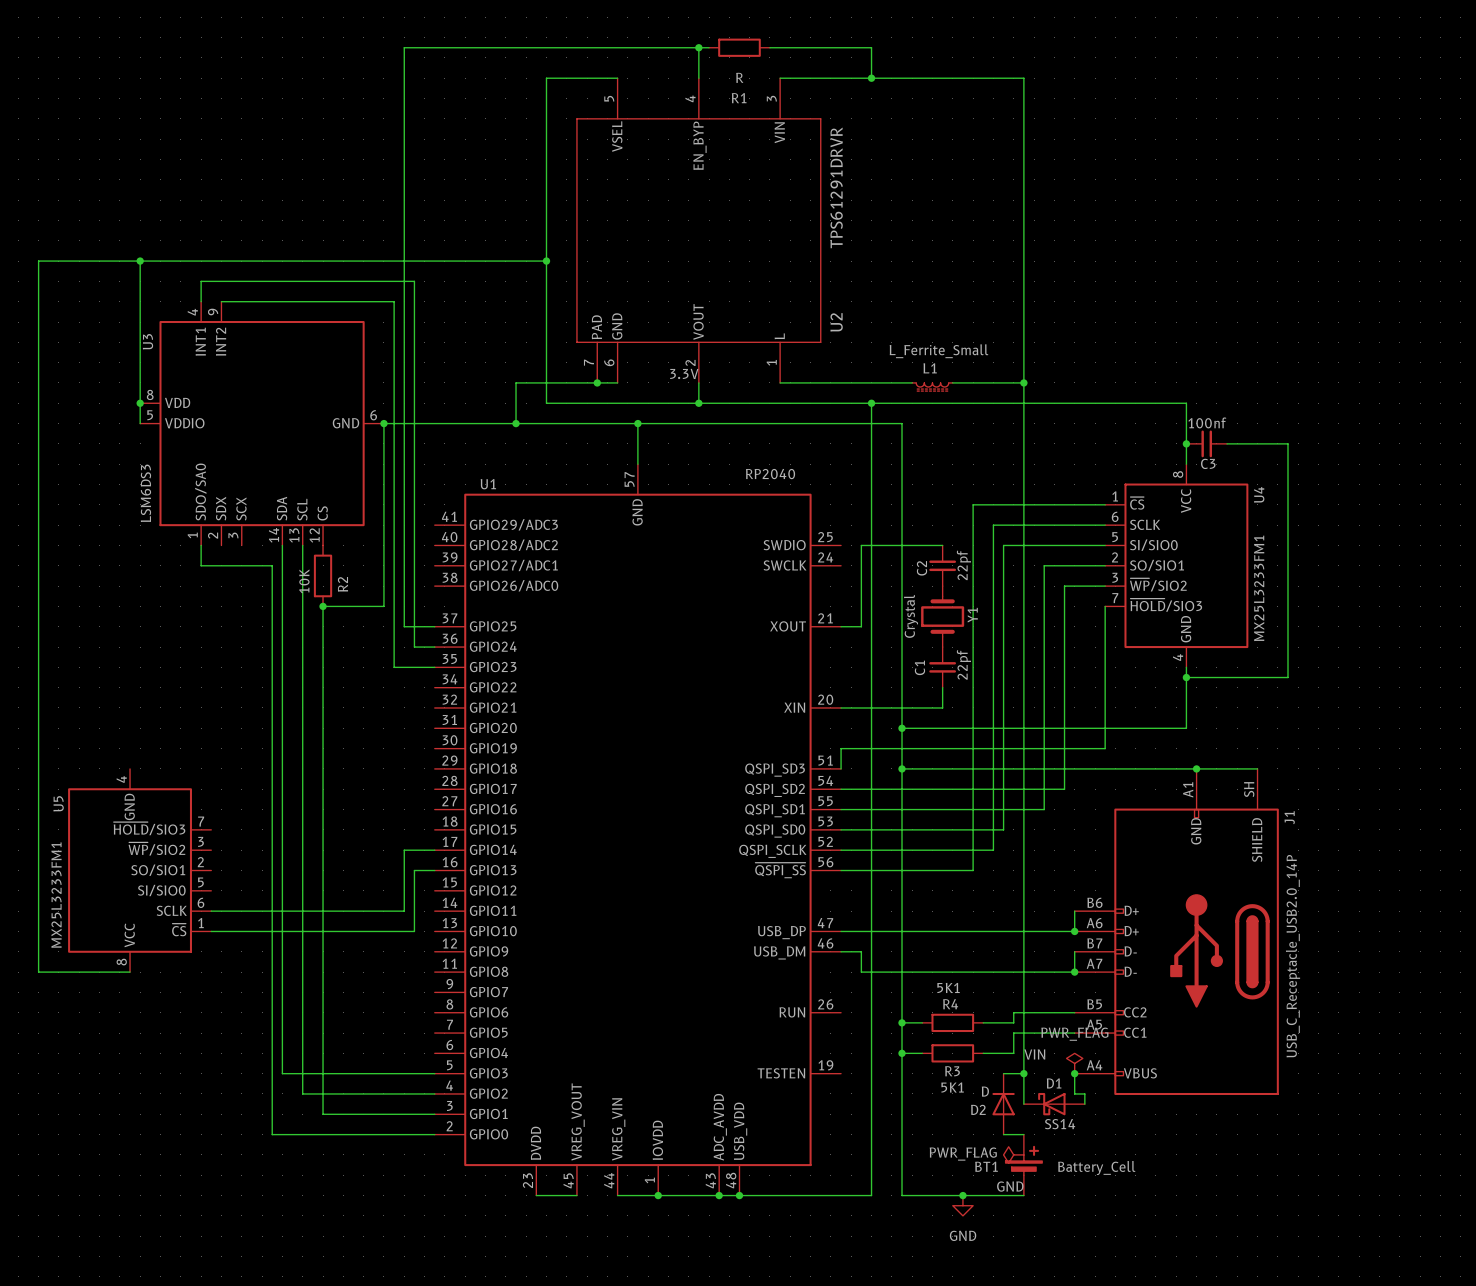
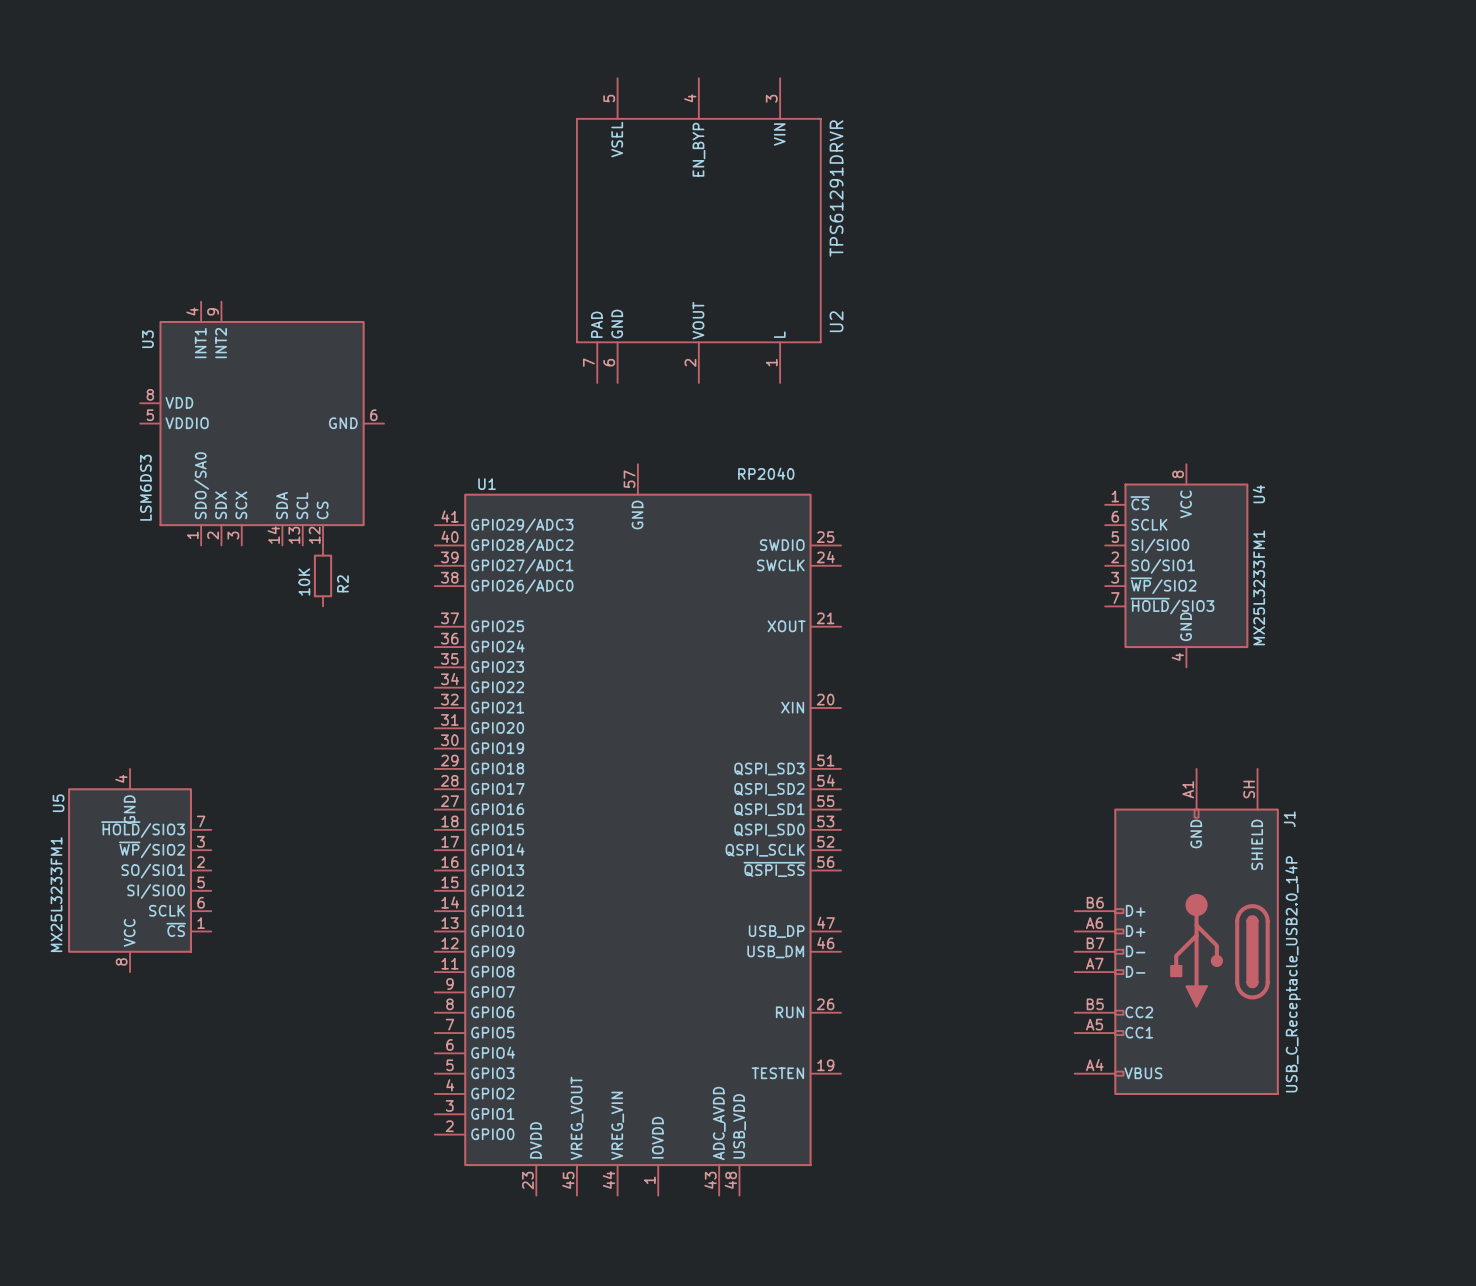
wire: (698, 47) (698, 78) -> none
junction: (698, 47) -> none
wire: (709, 47) (404, 47) (404, 626) (434, 626) -> none
R1: R (739, 47) -> none
wire: (769, 47) (871, 47) (871, 78) -> none
wire: (617, 78) (546, 78) (546, 403) (1186, 403) (1186, 464) -> none
wire: (780, 78) (1023, 78) (1023, 1104) -> none
junction: (871, 78) -> none
wire: (140, 261) (140, 423) -> none
junction: (140, 261) -> none
wire: (546, 261) (38, 261) (38, 972) (130, 972) -> none
junction: (546, 261) -> none
wire: (201, 301) (201, 281) (414, 281) (414, 647) (434, 647) -> none
wire: (221, 301) (394, 301) (394, 667) (434, 667) -> none
label: 3.3V (684, 373) -> none
junction: (597, 382) -> none
wire: (617, 382) (516, 382) (516, 423) -> none
wire: (698, 382) (698, 403) -> none
wire: (780, 382) (912, 382) -> none
wire: (952, 382) (1023, 382) -> none
junction: (1023, 382) -> none
L1: L_Ferrite_Small (932, 387) -> none
junction: (140, 403) -> none
junction: (698, 403) -> none
wire: (871, 403) (871, 1195) (617, 1195) -> none
junction: (871, 403) -> none
junction: (383, 423) -> none
junction: (516, 423) -> none
wire: (637, 423) (637, 464) -> none
junction: (637, 423) -> none
junction: (1186, 443) -> none
C3: 100nf (1206, 443) -> none
wire: (1227, 443) (1287, 443) (1287, 677) (1186, 677) -> none
wire: (1105, 504) (973, 504) (973, 870) (841, 870) -> none
wire: (1105, 525) (993, 525) (993, 850) (841, 850) -> none
wire: (201, 545) (201, 565) (272, 565) (272, 1134) (434, 1134) -> none
wire: (282, 545) (282, 1073) (434, 1073) -> none
wire: (302, 545) (302, 1093) (434, 1093) -> none
wire: (942, 545) (861, 545) (861, 626) (841, 626) -> none
wire: (1105, 545) (1003, 545) (1003, 829) (841, 829) -> none
C2: 22pf (942, 565) -> none
wire: (1105, 565) (1044, 565) (1044, 809) (841, 809) -> none
wire: (1105, 586) (1064, 586) (1064, 789) (841, 789) -> none
junction: (323, 606) -> none
wire: (1105, 606) (1105, 748) (841, 748) (841, 768) -> none
Y1: Crystal (942, 616) -> none
C1: 22pf (942, 667) -> none
wire: (1186, 667) (1186, 728) (902, 728) -> none
junction: (1186, 677) -> none
wire: (942, 687) (942, 707) (841, 707) -> none
junction: (902, 728) -> none
wire: (902, 768) (1257, 768) -> none
junction: (902, 768) -> none
junction: (1196, 768) -> none
wire: (434, 850) (404, 850) (404, 911) (211, 911) -> none
wire: (434, 870) (414, 870) (414, 931) (211, 931) -> none
wire: (1074, 911) (1074, 931) (841, 931) -> none
junction: (1074, 931) -> none
wire: (841, 951) (861, 951) (861, 972) (1074, 972) (1074, 951) -> none
junction: (1074, 972) -> none
wire: (1074, 1012) (1013, 1012) (1013, 1022) (983, 1022) -> none
wire: (902, 1022) (922, 1022) -> none
junction: (902, 1022) -> none
R4: 5K1 (952, 1022) -> none
wire: (1074, 1033) (1013, 1033) (1013, 1053) (983, 1053) -> none
wire: (902, 1053) (922, 1053) -> none
junction: (902, 1053) -> none
R3: 5K1 (952, 1053) -> none
label: VIN (1034, 1054) -> none
power symbol: PWR_FLAG (1074, 1063) -> none
wire: (1003, 1073) (1023, 1073) -> none
junction: (1023, 1073) -> none
wire: (1074, 1073) (1074, 1093) (1084, 1093) (1084, 1104) -> none
junction: (1074, 1073) -> none
D2: D (1003, 1104) -> none
D1: SS14 (1054, 1104) -> none
wire: (434, 1114) (323, 1114) (323, 606) (383, 606) (383, 423) (902, 423) (902, 1195) (1023, 1195) -> none
wire: (1003, 1134) (1023, 1134) -> none
power symbol: PWR_FLAG (1013, 1154) -> none
BT1: Battery_Cell (1023, 1165) -> none
label: GND (1010, 1186) -> none
wire: (536, 1195) (576, 1195) -> none
junction: (658, 1195) -> none
junction: (719, 1195) -> none
junction: (739, 1195) -> none
junction: (962, 1195) -> none
power symbol: GND (962, 1205) -> none

